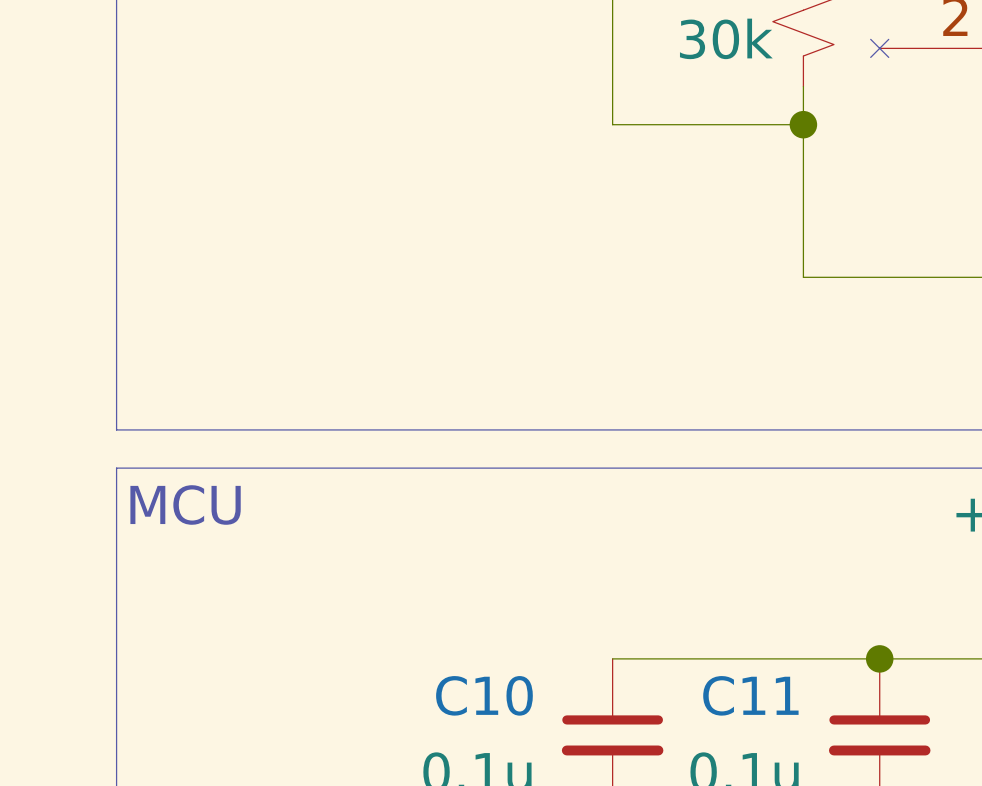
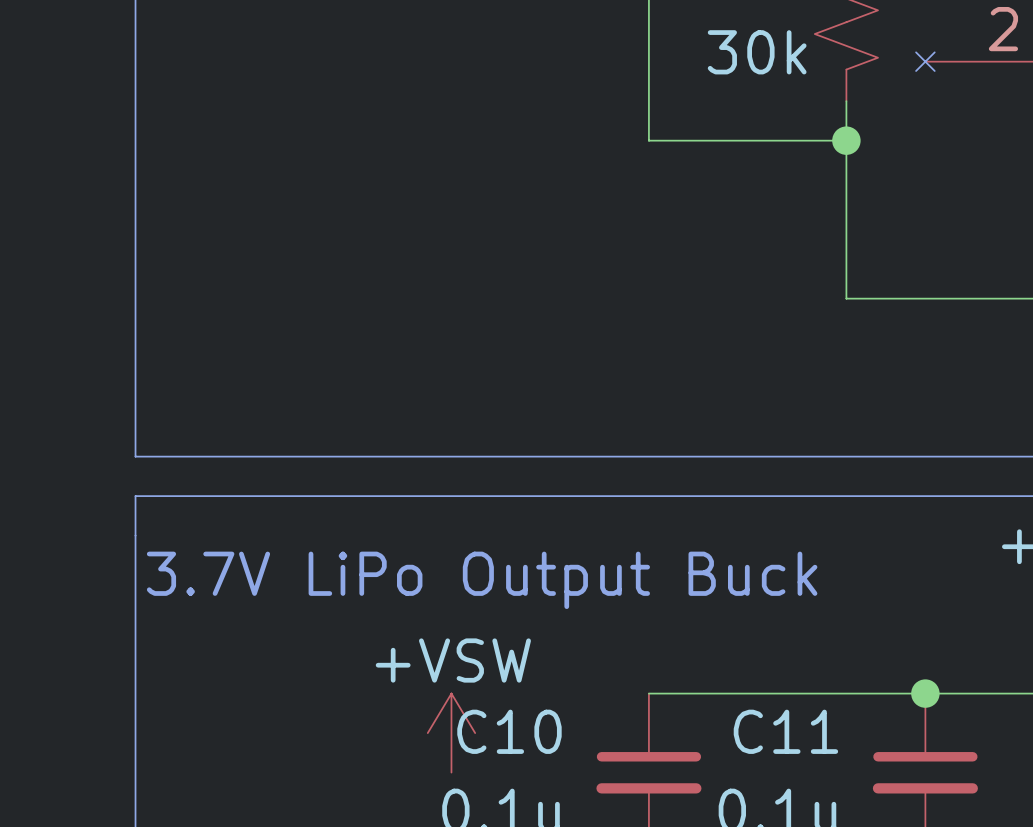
text: MCU (185, 504) -> none
text: none -> 3.7V LiPo Output Buck (482, 580)
power symbol: none -> +VSW (451, 733)

